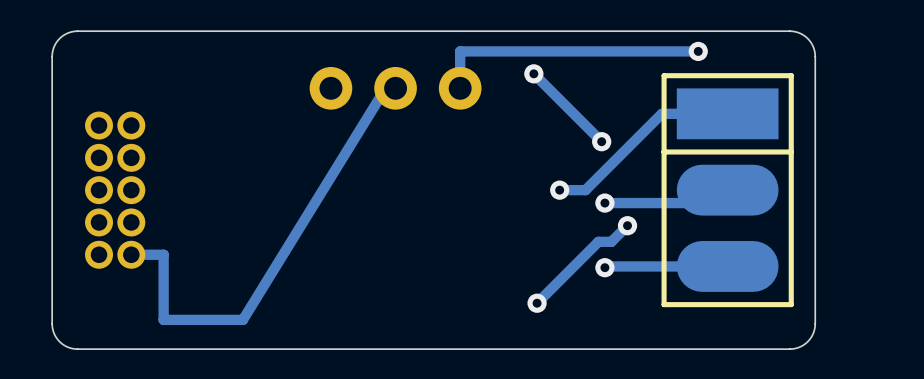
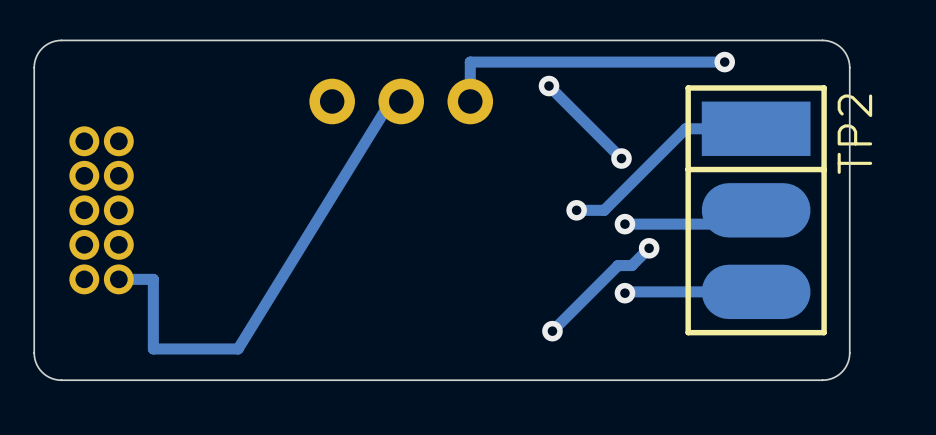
TP2 name: none -> TP2 (854, 134)

